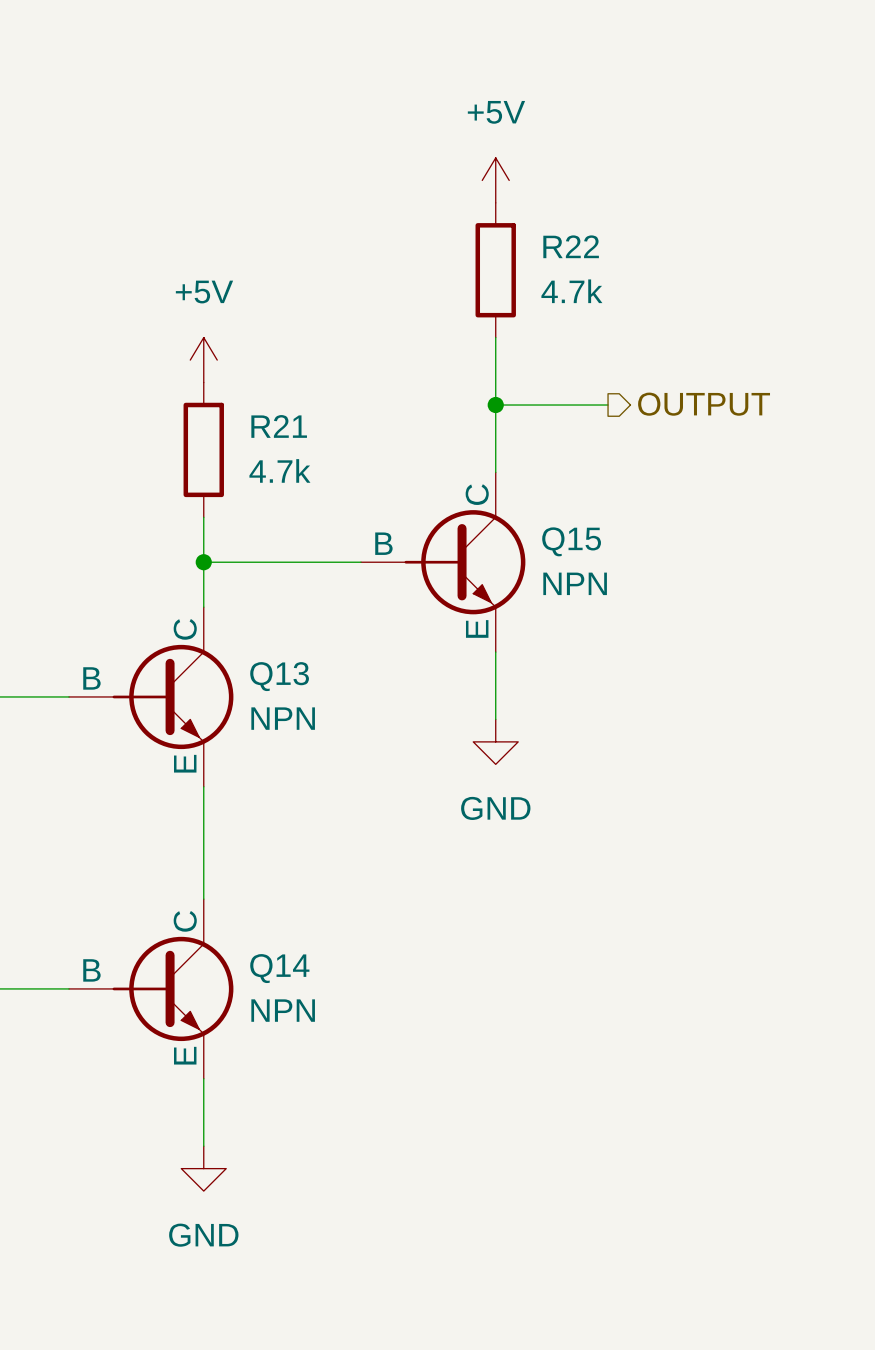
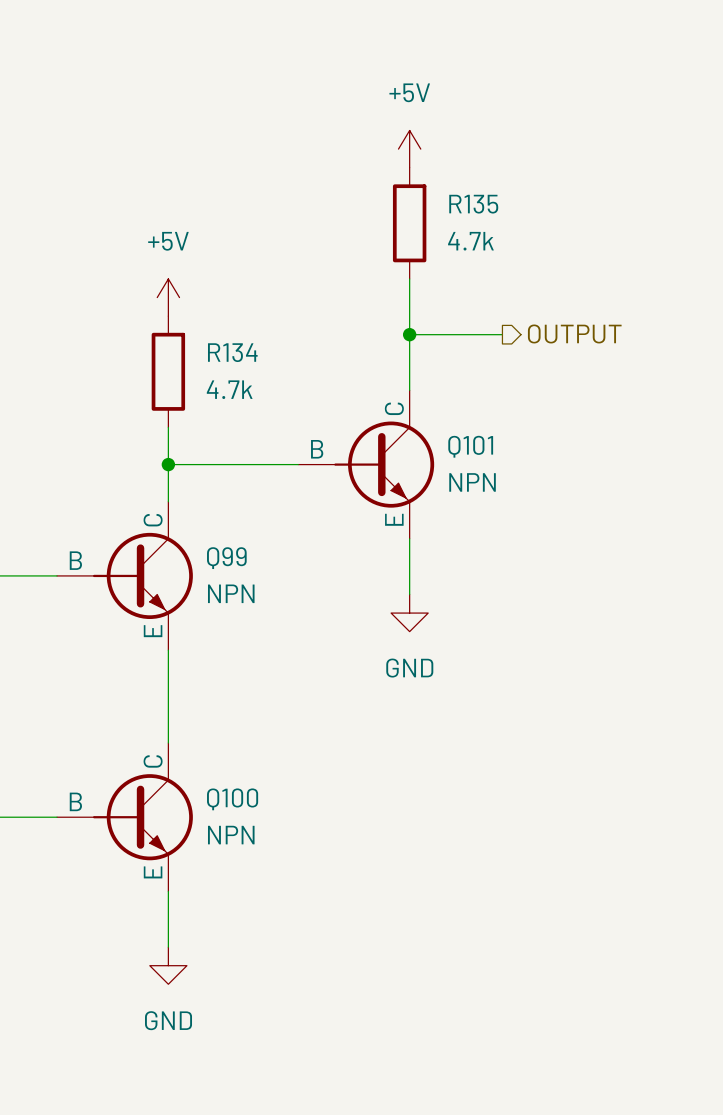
R22 name: R22 (571, 246) -> R135 (473, 204)
R21 name: R21 (279, 426) -> R134 (232, 352)
Q15 name: Q15 (571, 541) -> Q101 (470, 446)
Q13 name: Q13 (279, 676) -> Q99 (226, 558)
Q14 name: Q14 (279, 968) -> Q100 (232, 799)

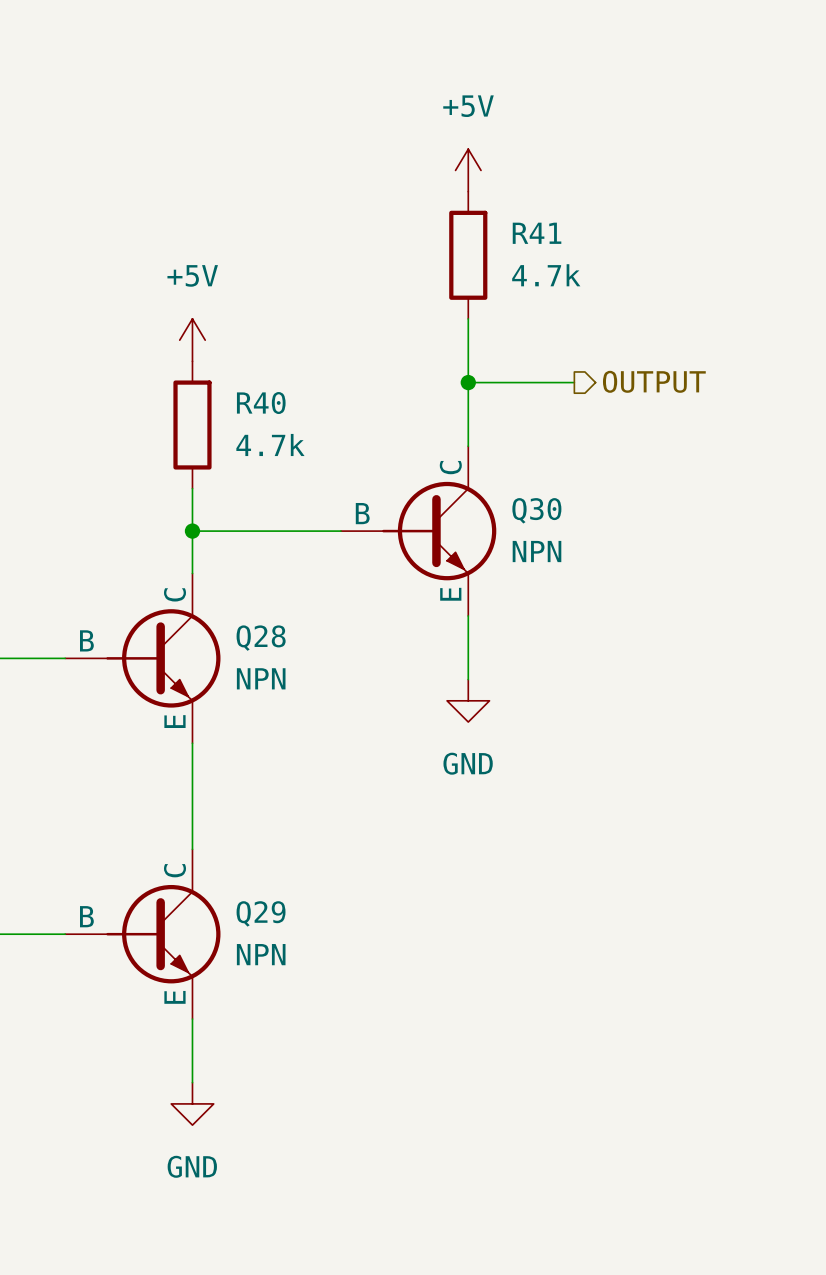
R135 name: R135 (473, 204) -> R41 (537, 233)
R134 name: R134 (232, 352) -> R40 (261, 403)
Q101 name: Q101 (470, 446) -> Q30 (536, 510)
Q99 name: Q99 (226, 558) -> Q28 (261, 638)
Q100 name: Q100 (232, 799) -> Q29 (261, 913)

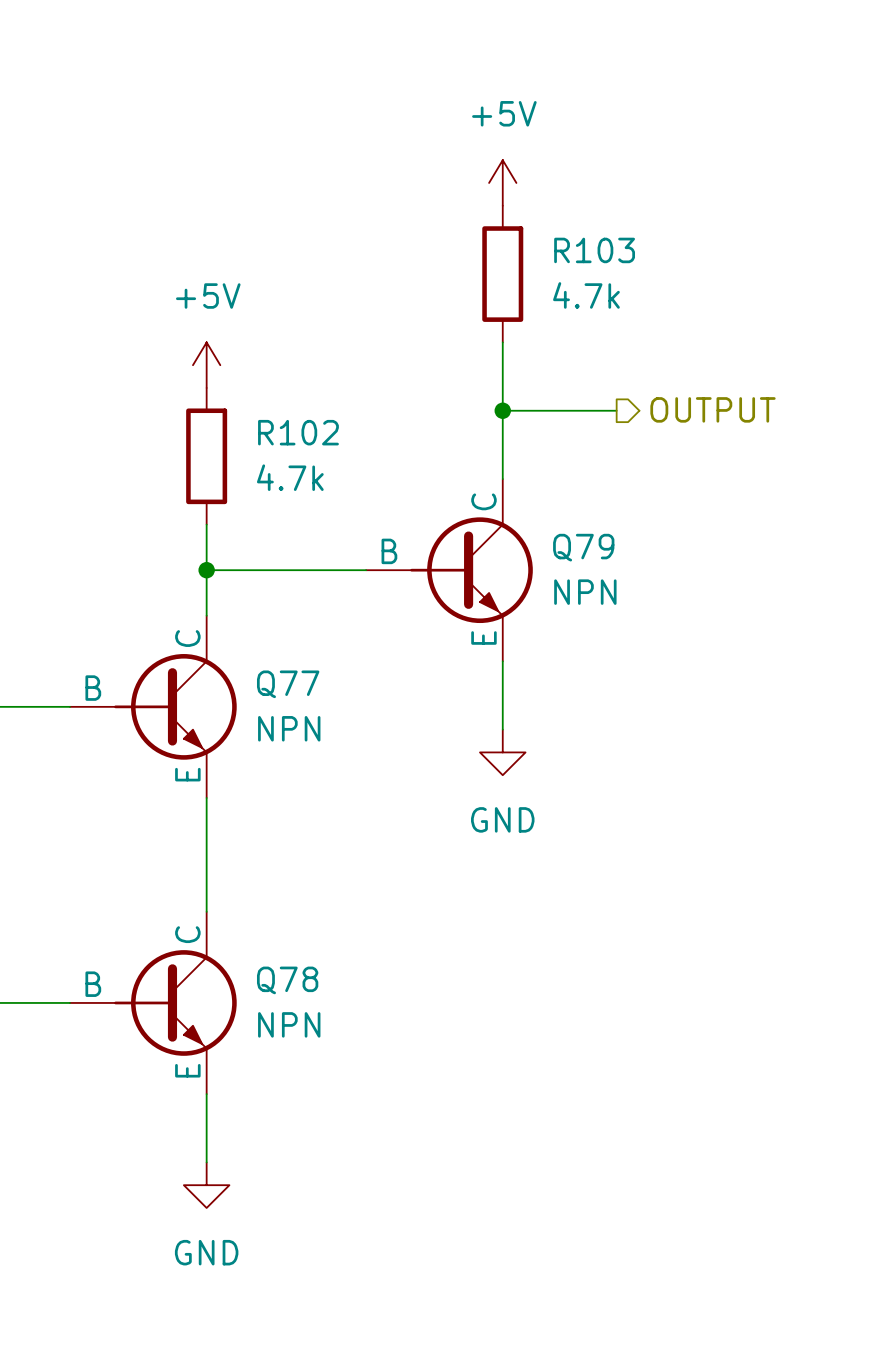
R41 name: R41 (537, 233) -> R103 (594, 250)
R40 name: R40 (261, 403) -> R102 (298, 432)
Q30 name: Q30 (536, 510) -> Q79 (583, 547)
Q28 name: Q28 (261, 638) -> Q77 (288, 684)
Q29 name: Q29 (261, 913) -> Q78 (287, 980)

